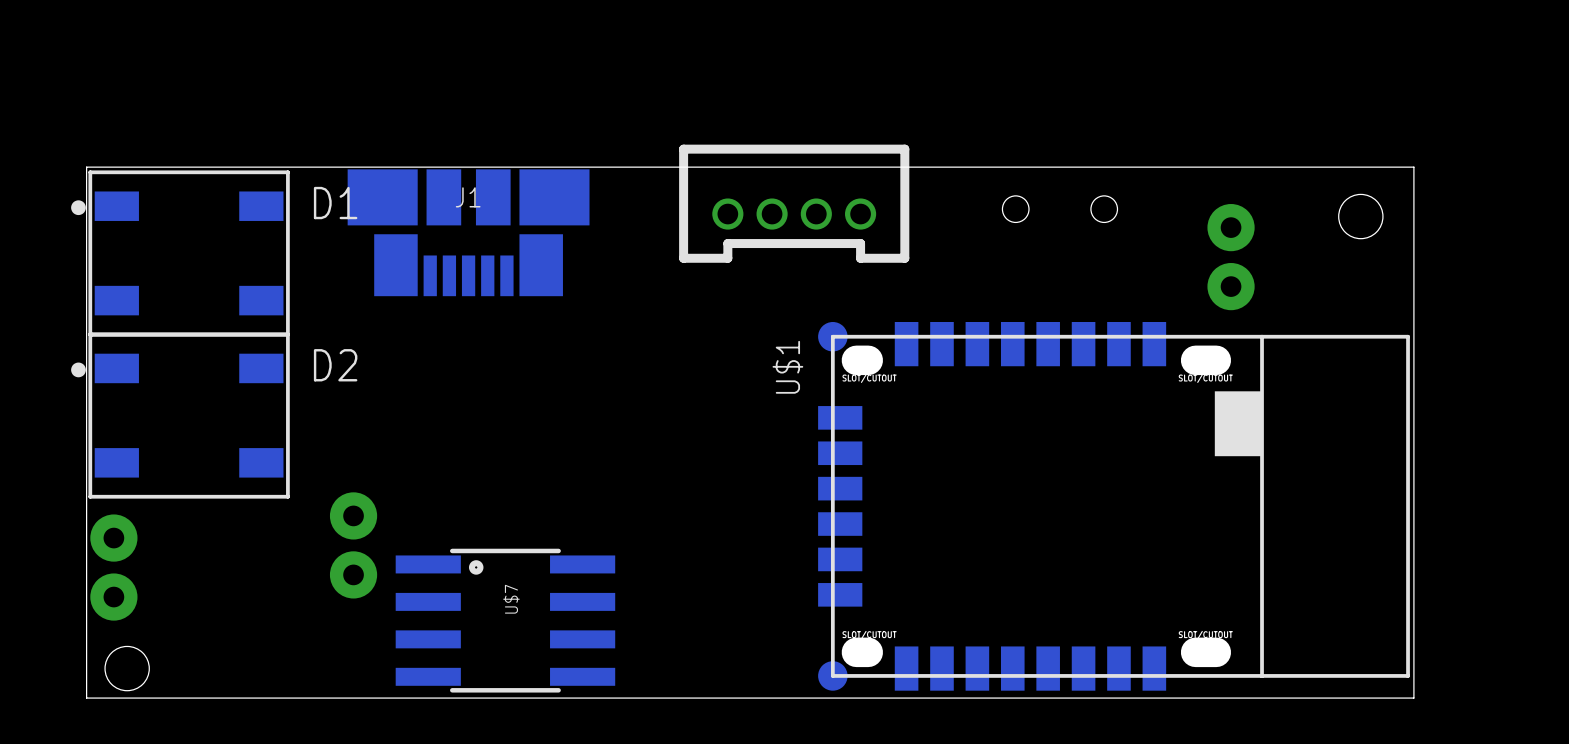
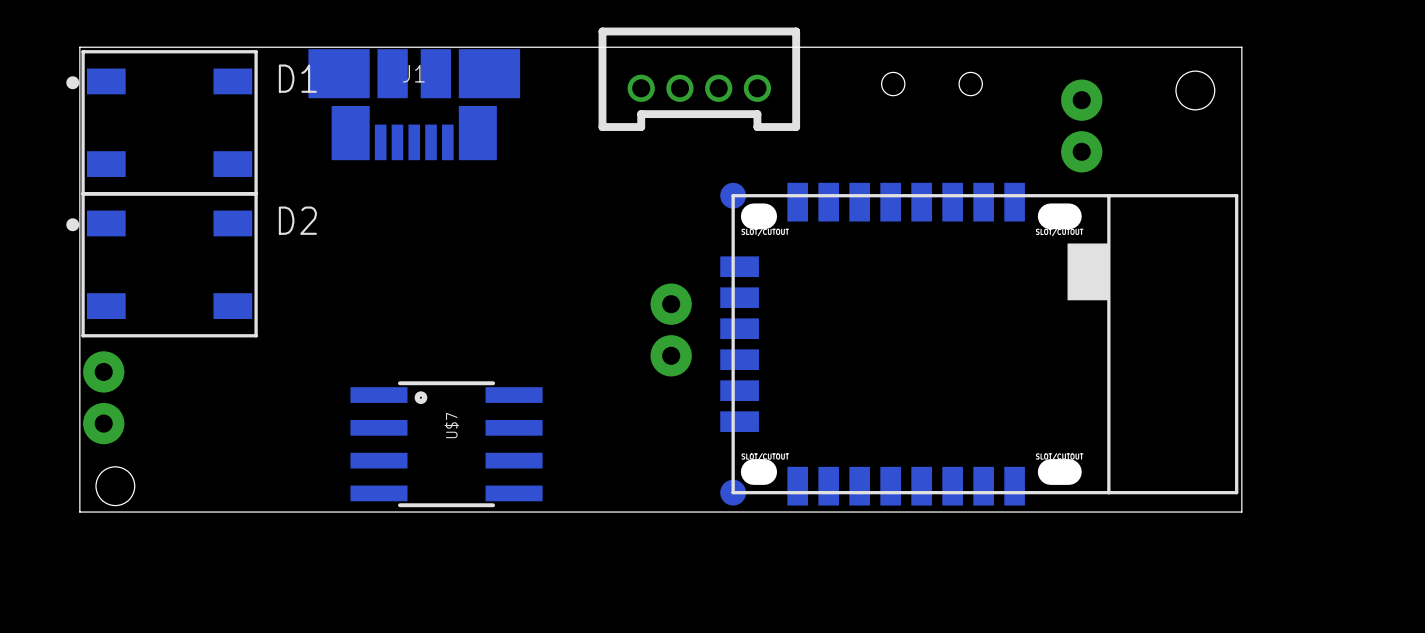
U$1 name: U$1 (787, 367) -> none
part position: (353, 545) -> (671, 329)

